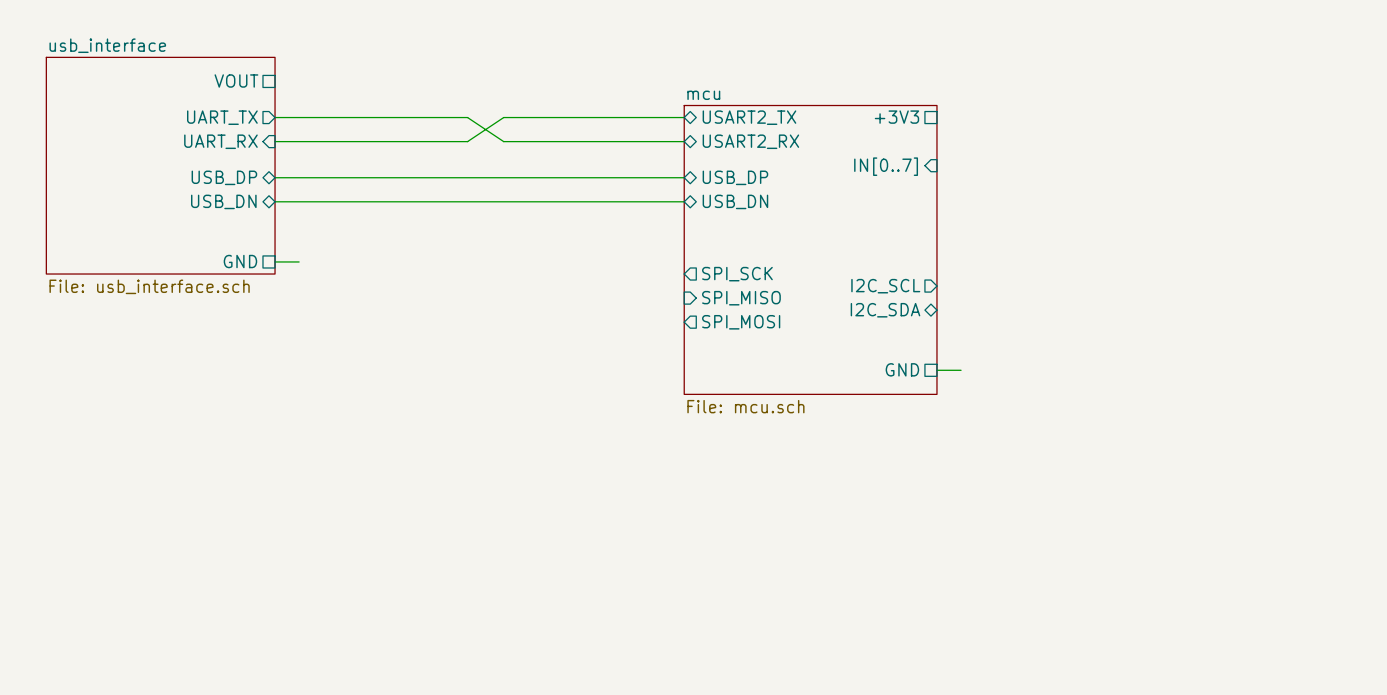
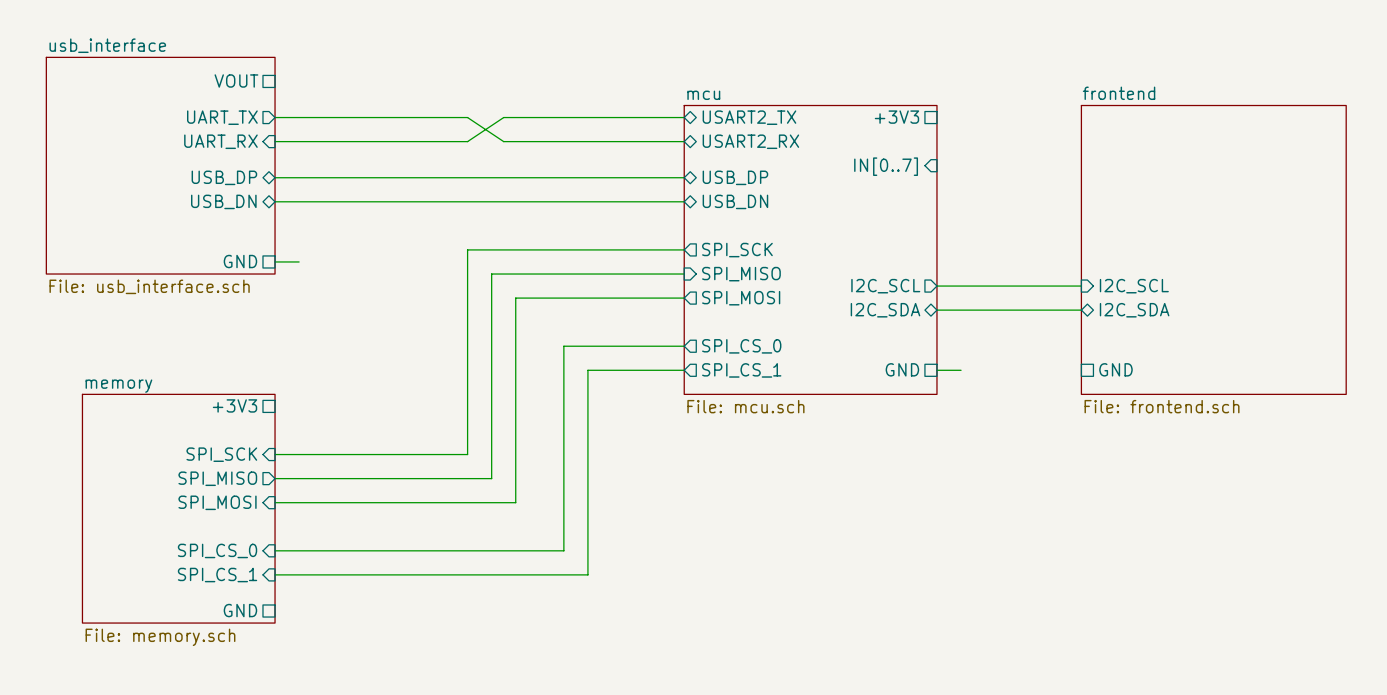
wire: none -> (684, 249) (467, 249) (467, 454) (275, 454)
sheet frontend: none -> File: frontend.sch (1213, 249)
sheet pin: none -> SPI_SCK (737, 250)
wire: none -> (684, 274) (491, 274) (491, 478) (275, 478)
sheet pin shape: output (737, 274) -> input (741, 274)
sheet pin: SPI_SCK (737, 274) -> SPI_MISO (741, 274)
wire: none -> (936, 286) (1081, 286)
sheet pin: none -> I2C_SCL (1134, 286)
wire: none -> (684, 298) (515, 298) (515, 502) (275, 502)
sheet pin shape: input (741, 298) -> output (741, 298)
sheet pin: SPI_MISO (741, 298) -> SPI_MOSI (741, 298)
wire: none -> (936, 310) (1081, 310)
sheet pin: none -> I2C_SDA (1134, 310)
sheet pin: SPI_MOSI (741, 322) -> SPI_CS_0 (741, 346)
wire: none -> (684, 346) (563, 346) (563, 550) (275, 550)
sheet pin: none -> GND (1115, 369)
wire: none -> (684, 370) (587, 370) (587, 574) (275, 574)
sheet pin: none -> SPI_CS_1 (741, 370)
sheet pin: none -> +3V3 (235, 405)
sheet pin: none -> SPI_SCK (221, 454)
sheet pin: none -> SPI_MISO (217, 478)
sheet pin: none -> SPI_MOSI (217, 502)
sheet memory: none -> File: memory.sch (178, 508)
sheet pin: none -> SPI_CS_0 (217, 550)
sheet pin: none -> SPI_CS_1 (217, 575)
sheet pin: none -> GND (240, 610)

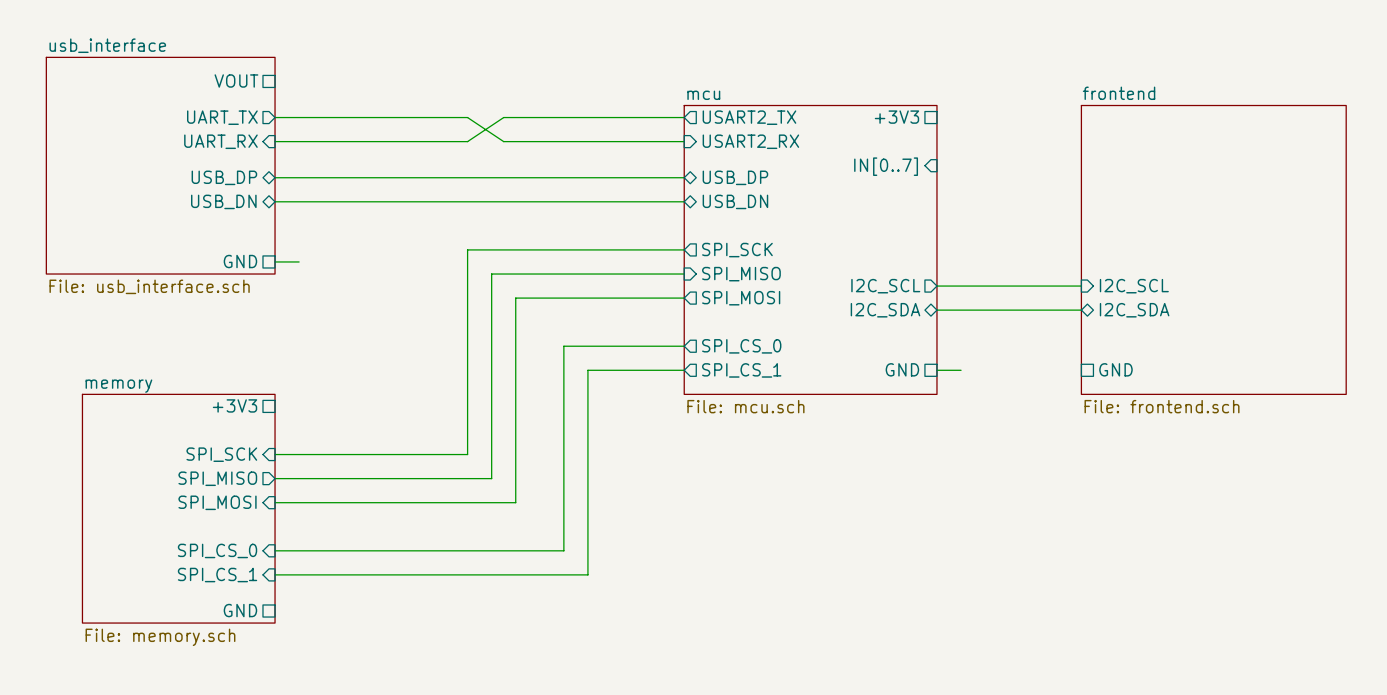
sheet pin shape: bidirectional (749, 117) -> output (749, 117)
sheet pin shape: bidirectional (750, 141) -> input (750, 141)

